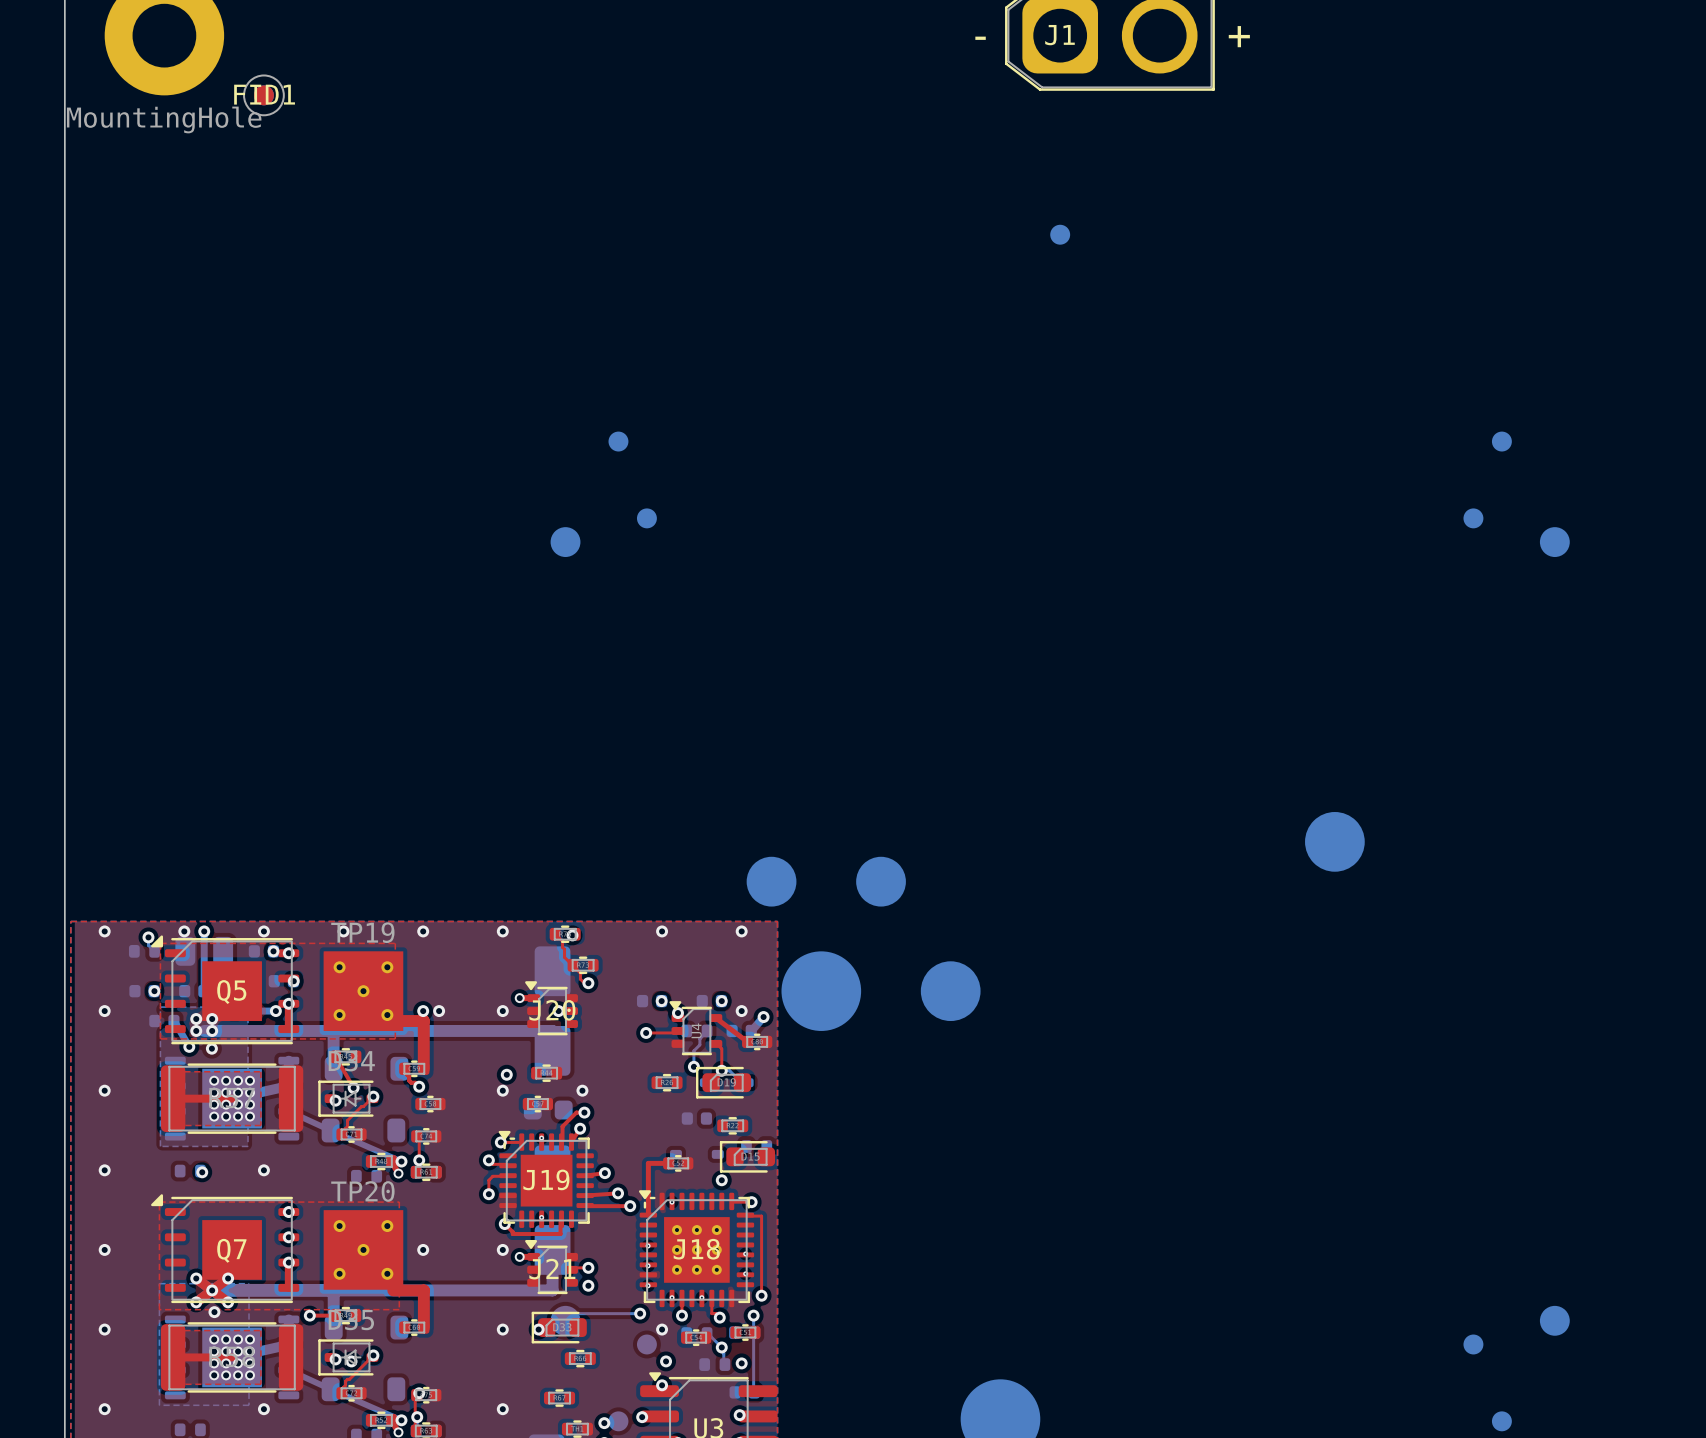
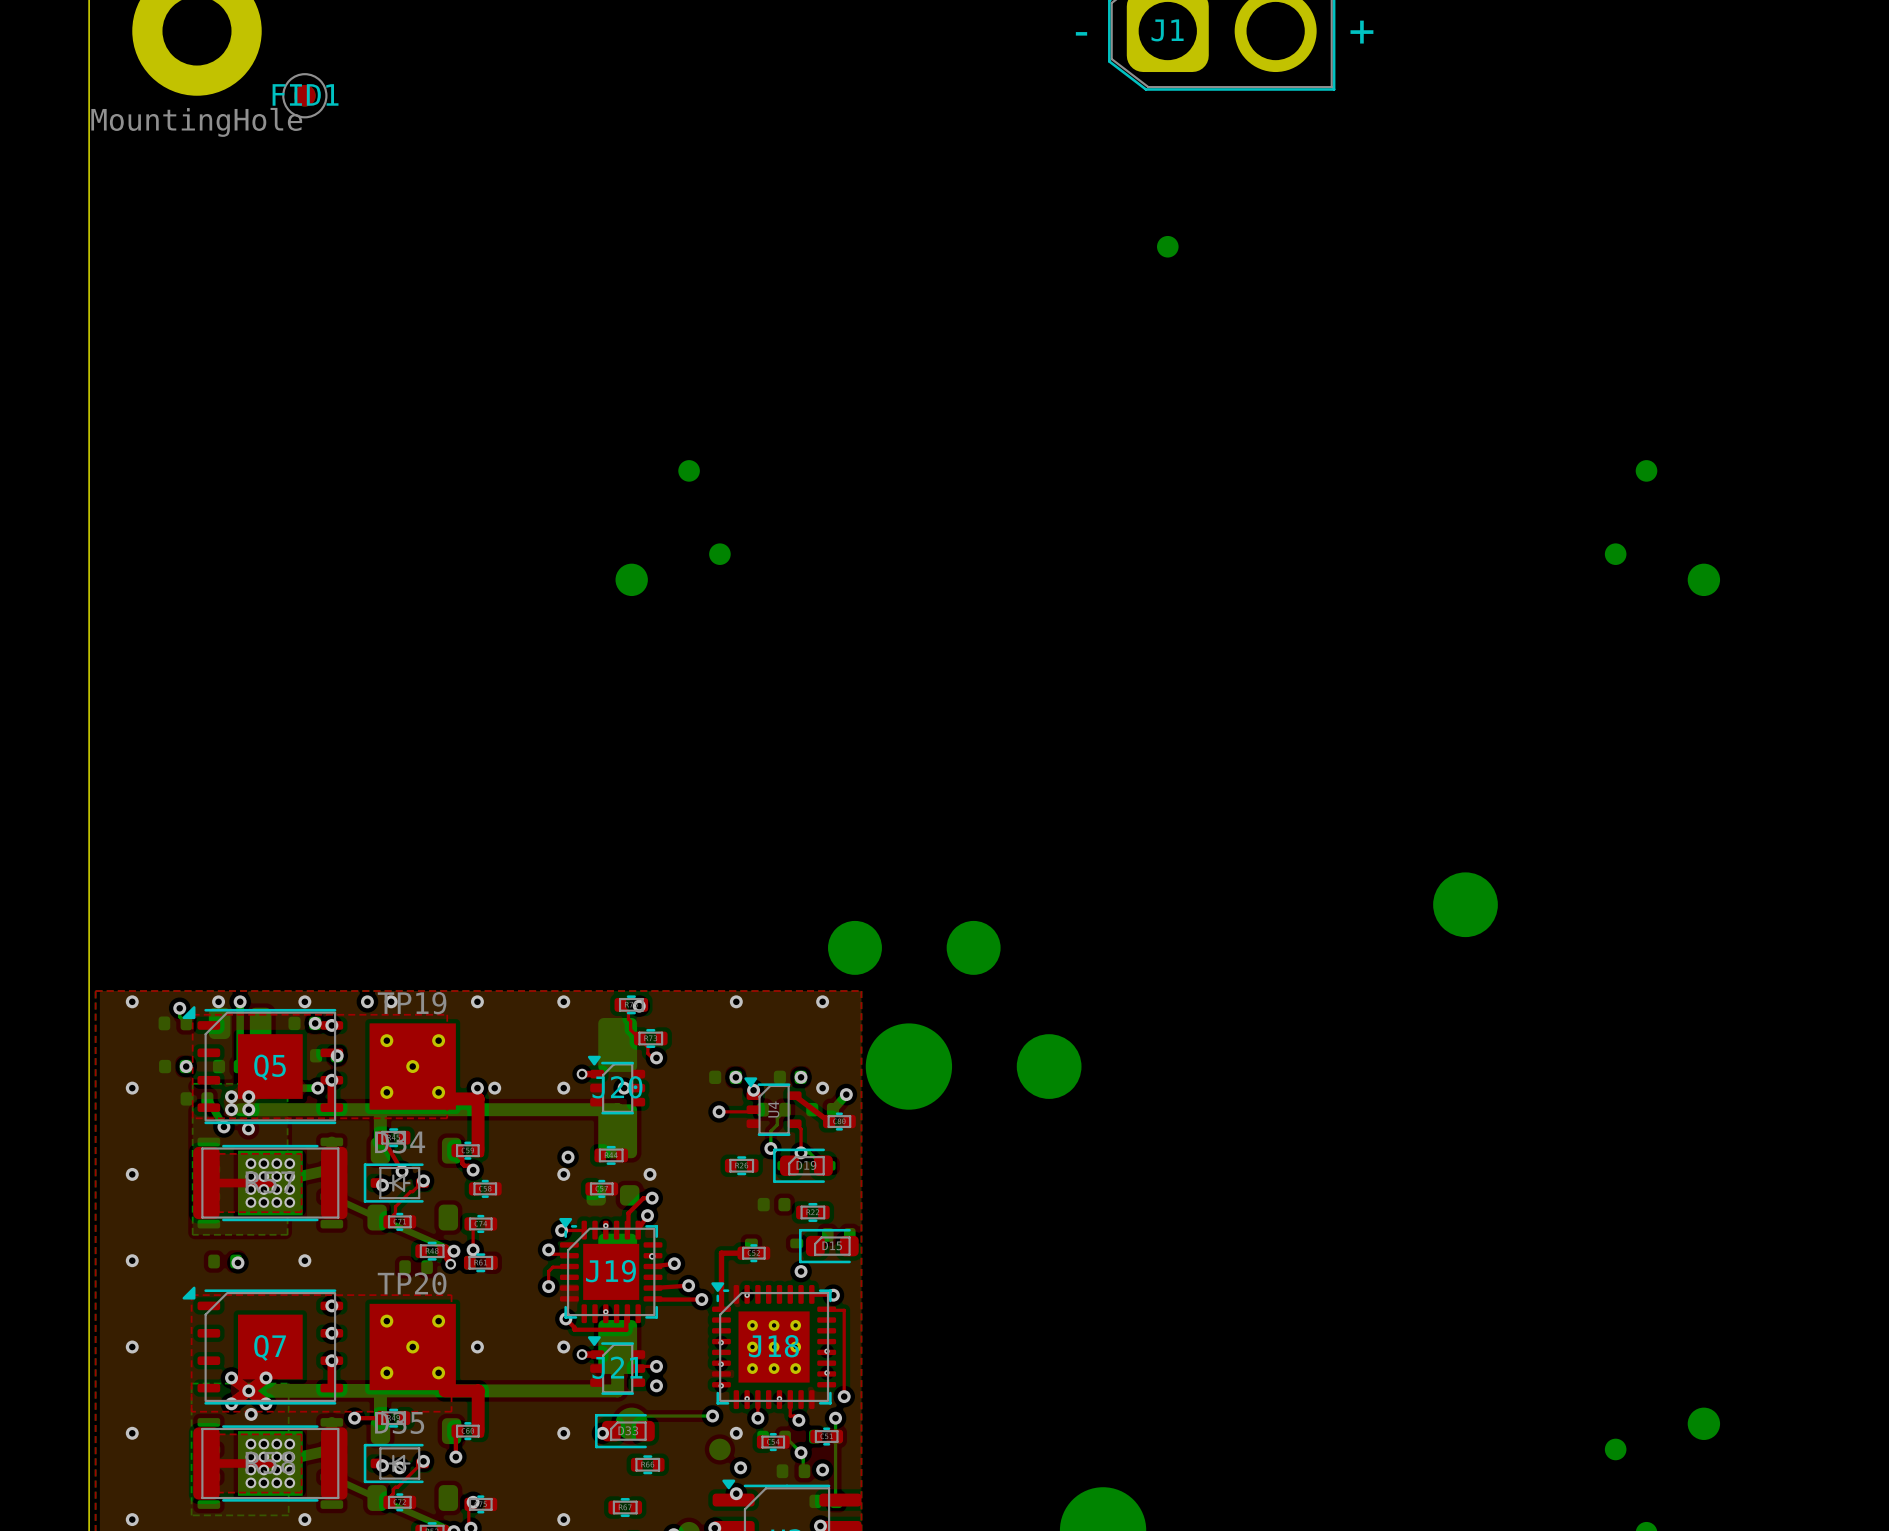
via: none -> (367, 1001)
via: none -> (652, 1256)
top track: none -> (455, 1433) (455, 1457)
via: none -> (455, 1457)

